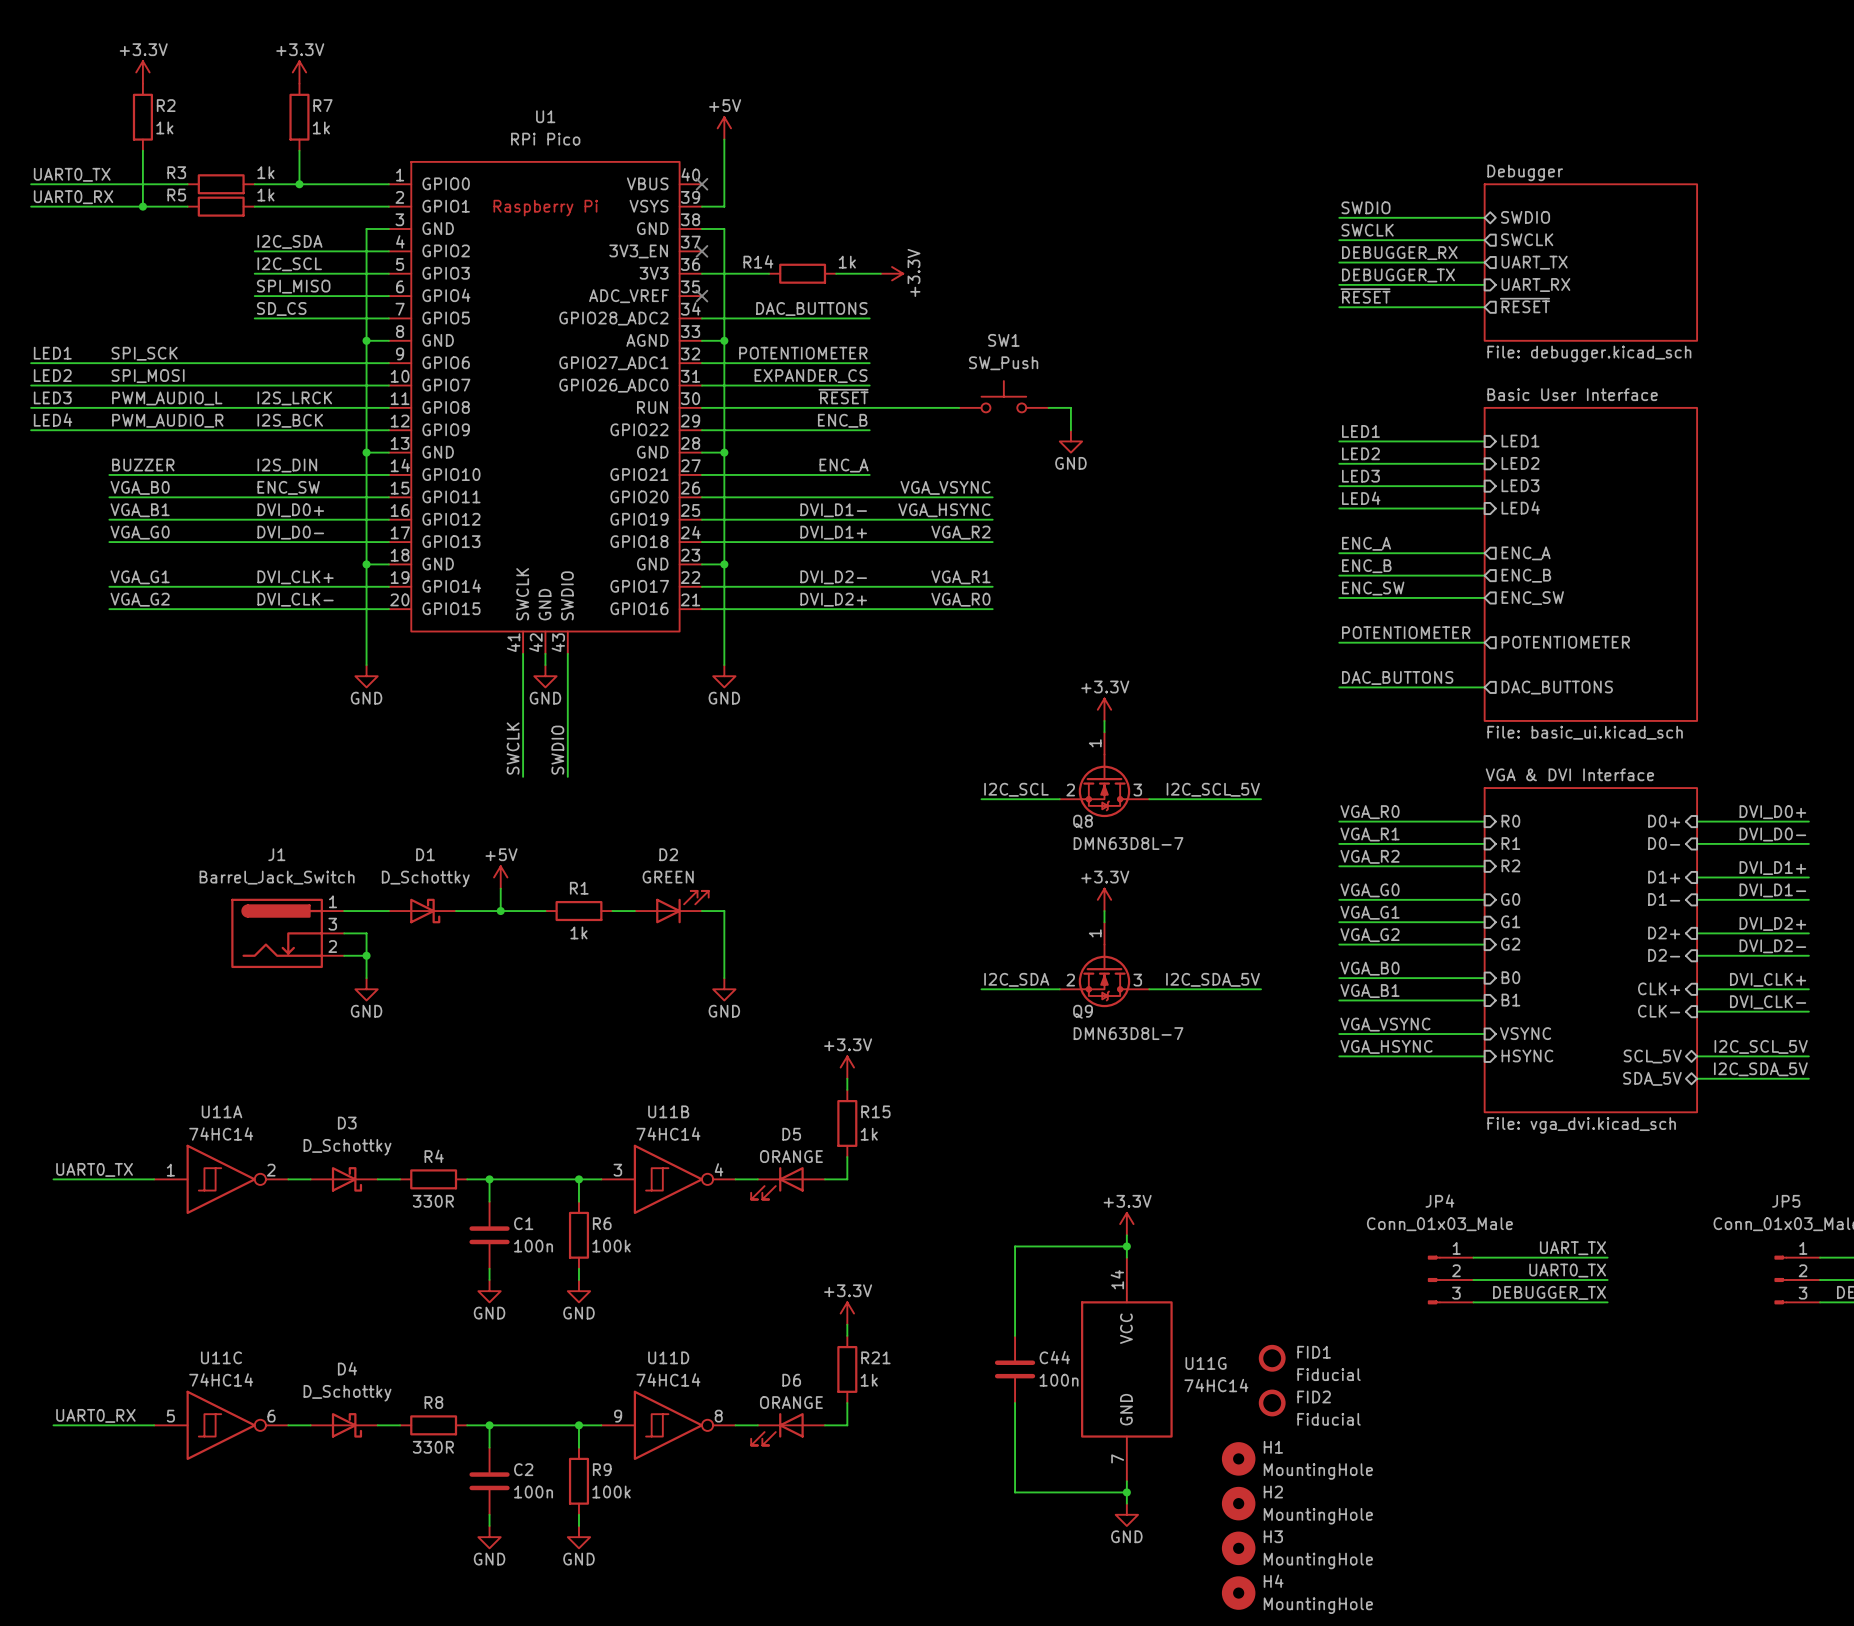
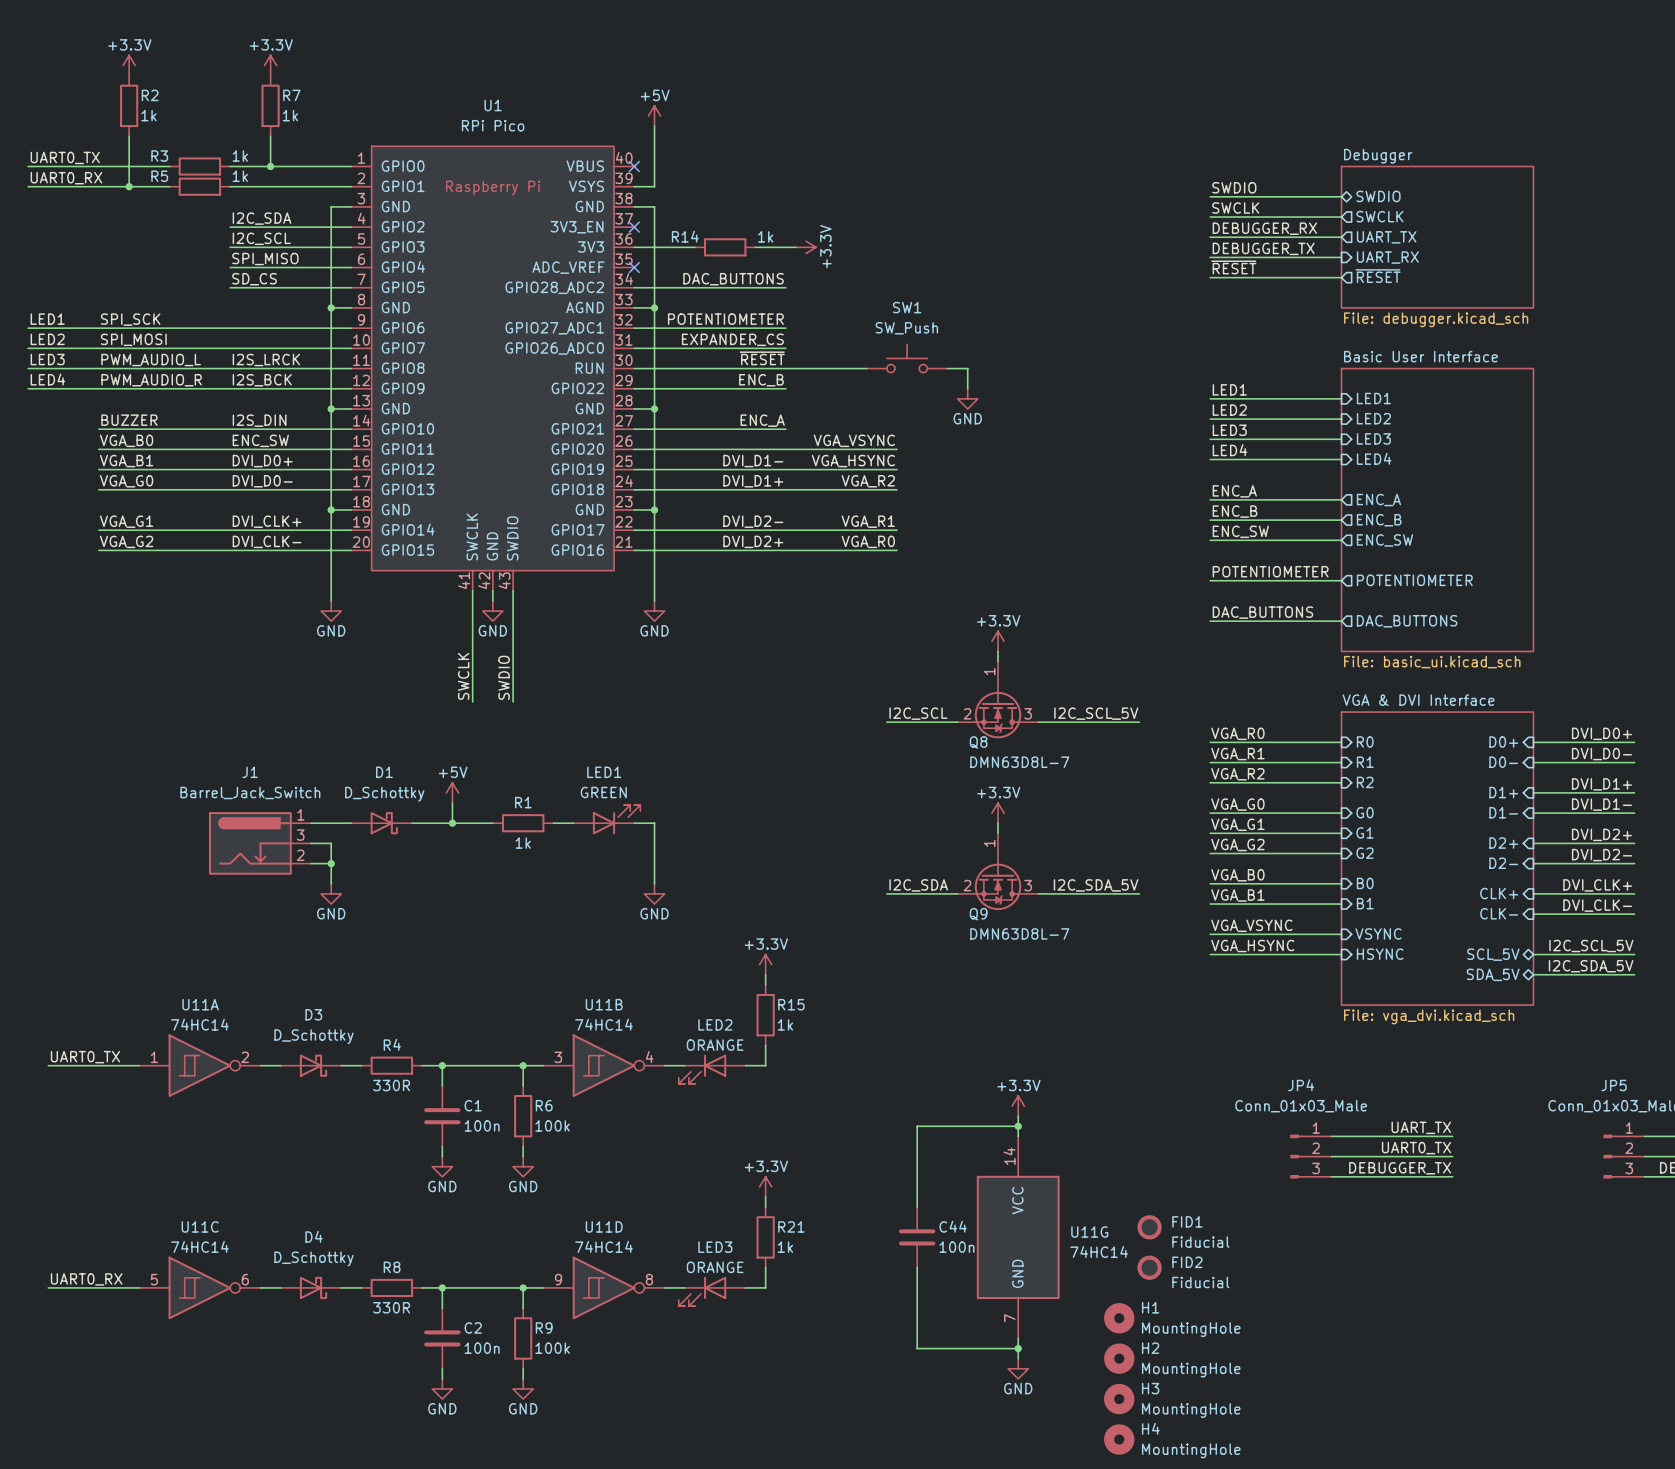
D2 name: D2 (668, 854) -> LED1 (604, 772)
D5 name: D5 (791, 1134) -> LED2 (715, 1024)
D6 name: D6 (791, 1380) -> LED3 (715, 1247)

